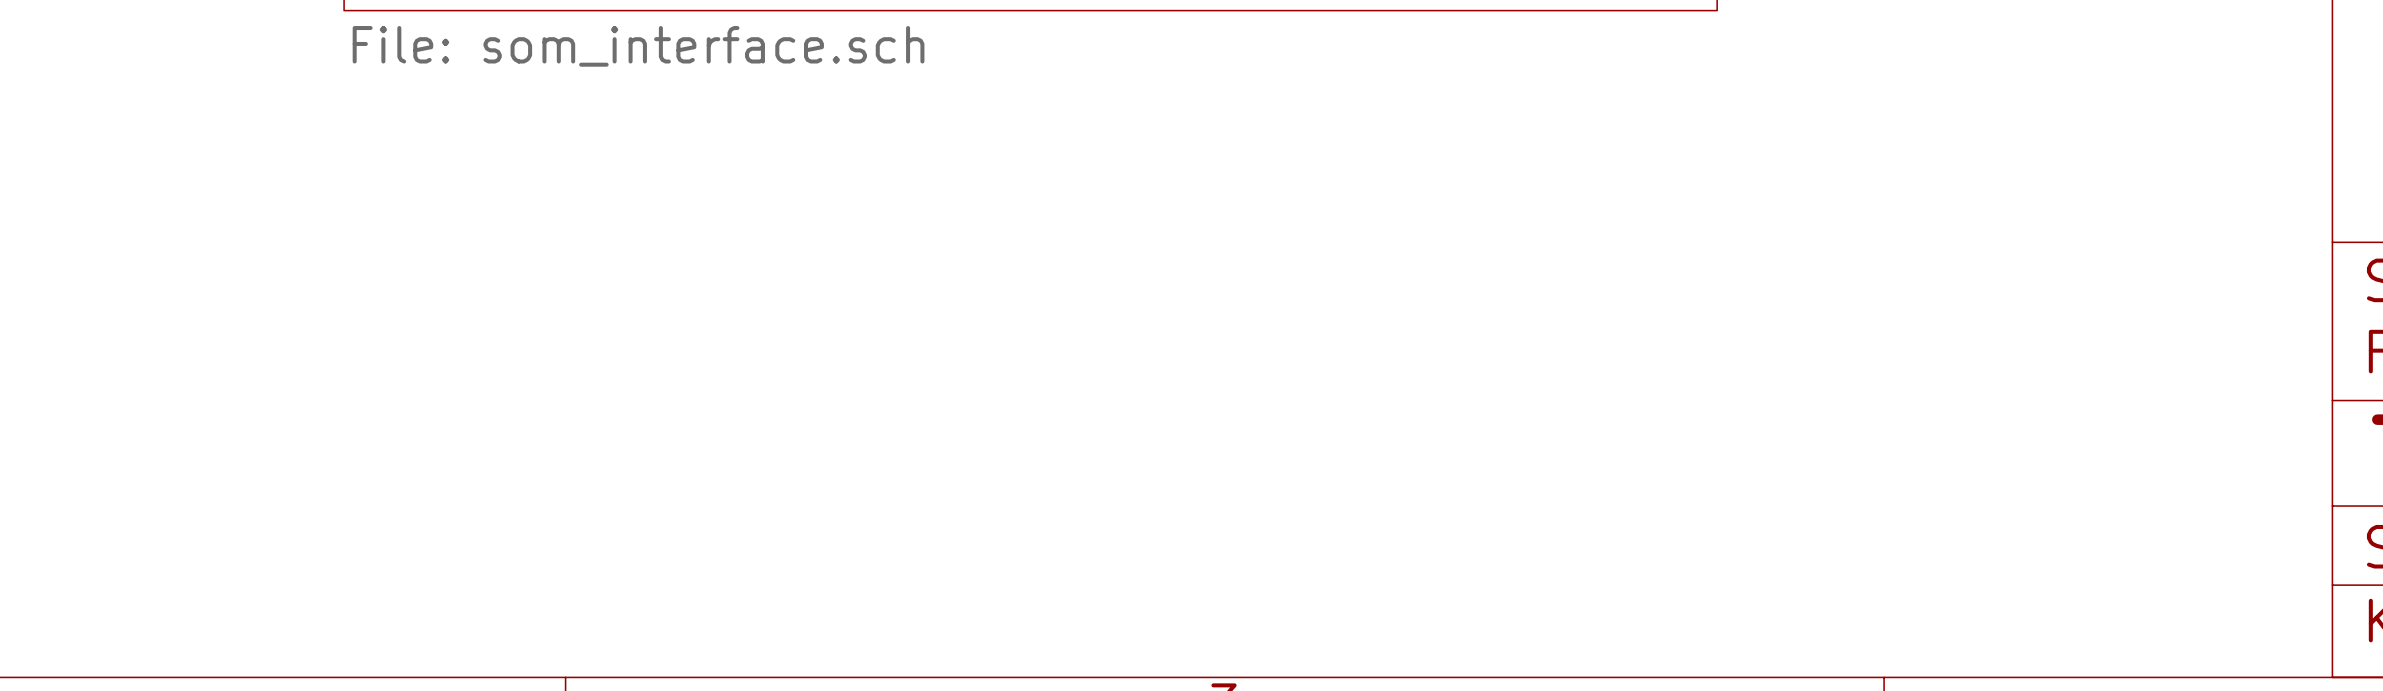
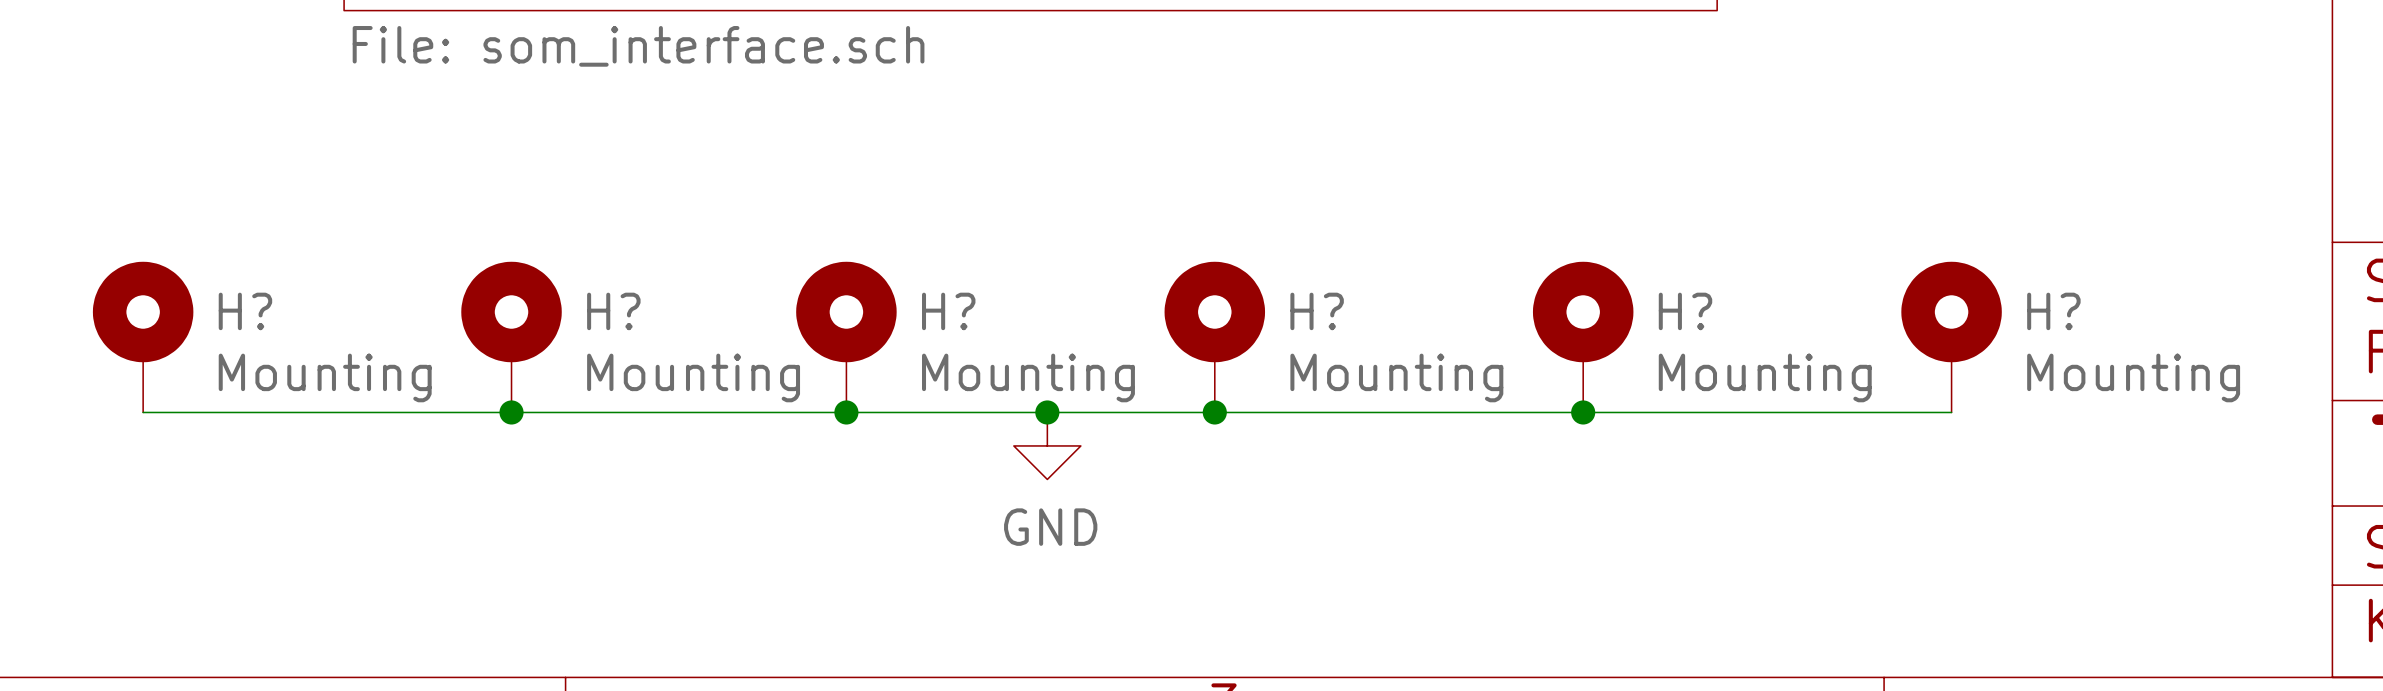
H?: none -> Mounting (143, 337)
H?: none -> Mounting (511, 337)
H?: none -> Mounting (846, 337)
H?: none -> Mounting (1214, 337)
H?: none -> Mounting (1583, 337)
H?: none -> Mounting (1951, 337)
wire: none -> (143, 412) (1951, 412)
junction: none -> (511, 412)
junction: none -> (846, 412)
junction: none -> (1047, 412)
junction: none -> (1214, 412)
junction: none -> (1583, 412)
power symbol: none -> GND (1047, 445)

